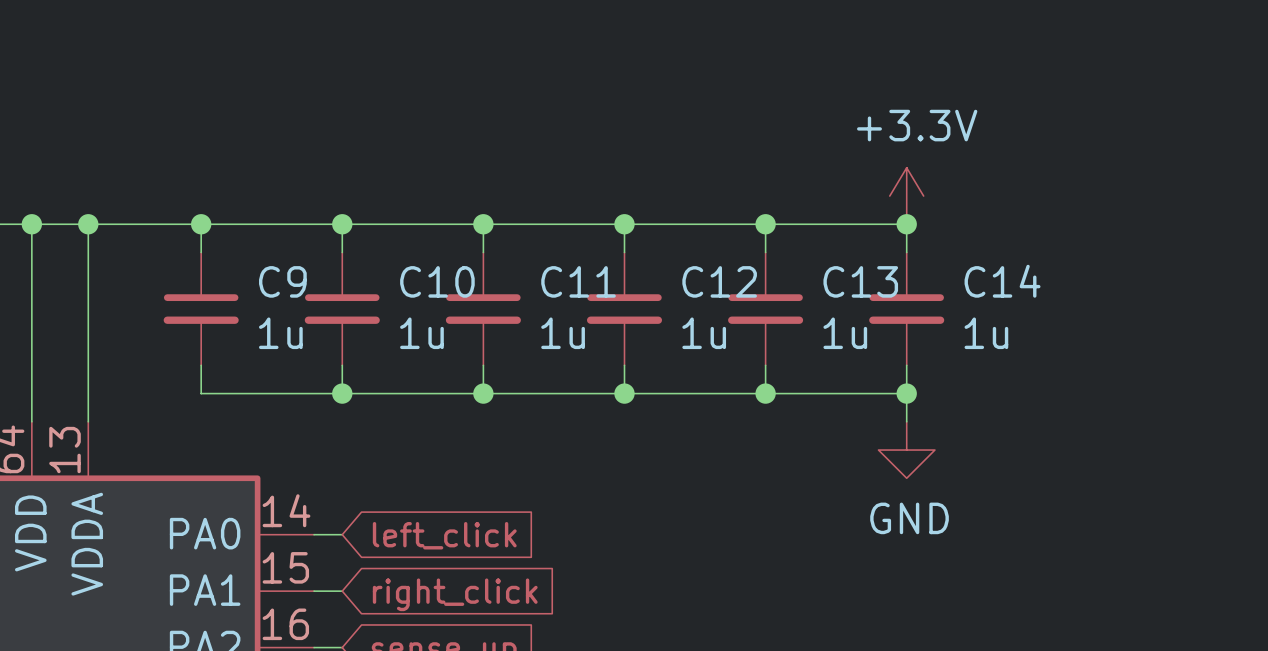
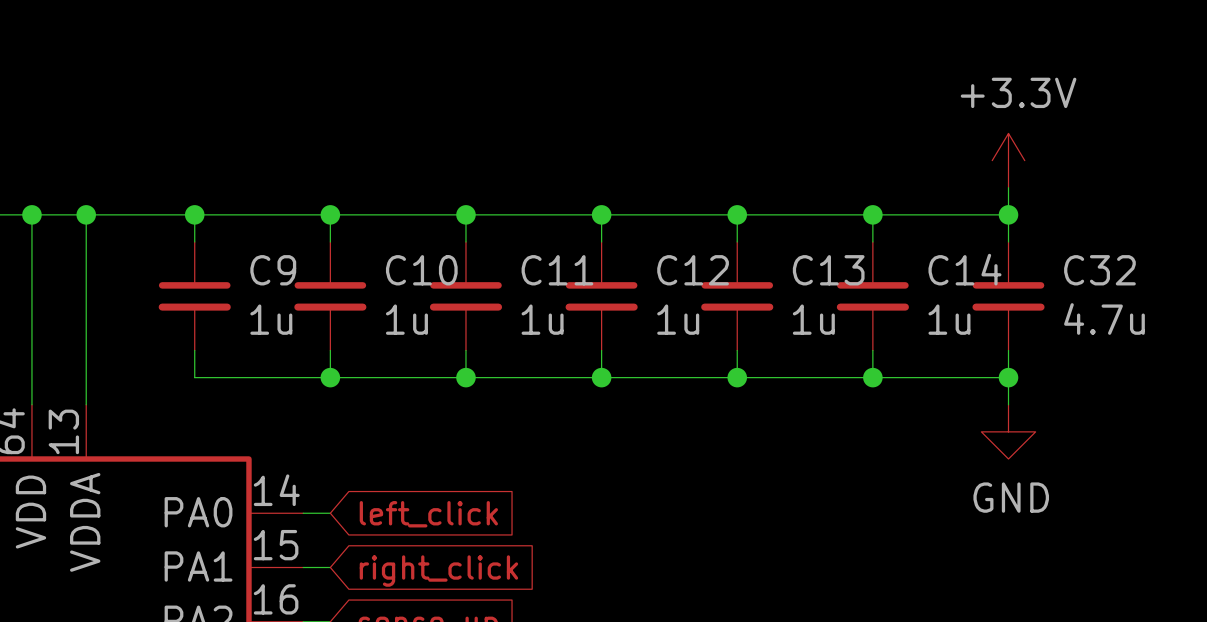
power symbol position: +3.3V (906, 196) -> +3.3V (1008, 160)
wire: none -> (1008, 187) (1008, 241)
wire: none -> (872, 214) (1008, 214)
junction: none -> (1008, 214)
C32: none -> 4.7u (1008, 296)
wire: none -> (1008, 350) (1008, 404)
wire: (906, 393) (906, 421) -> (872, 377) (1008, 377)
junction: none -> (1008, 377)
power symbol position: GND (906, 450) -> GND (1008, 431)

